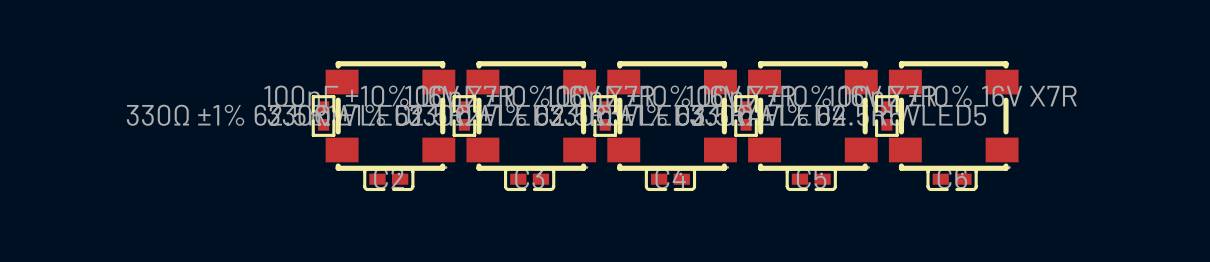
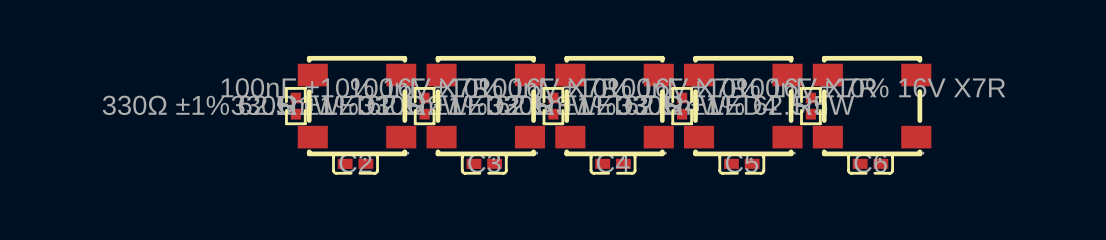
LED5 name: LED5 (954, 115) -> none

